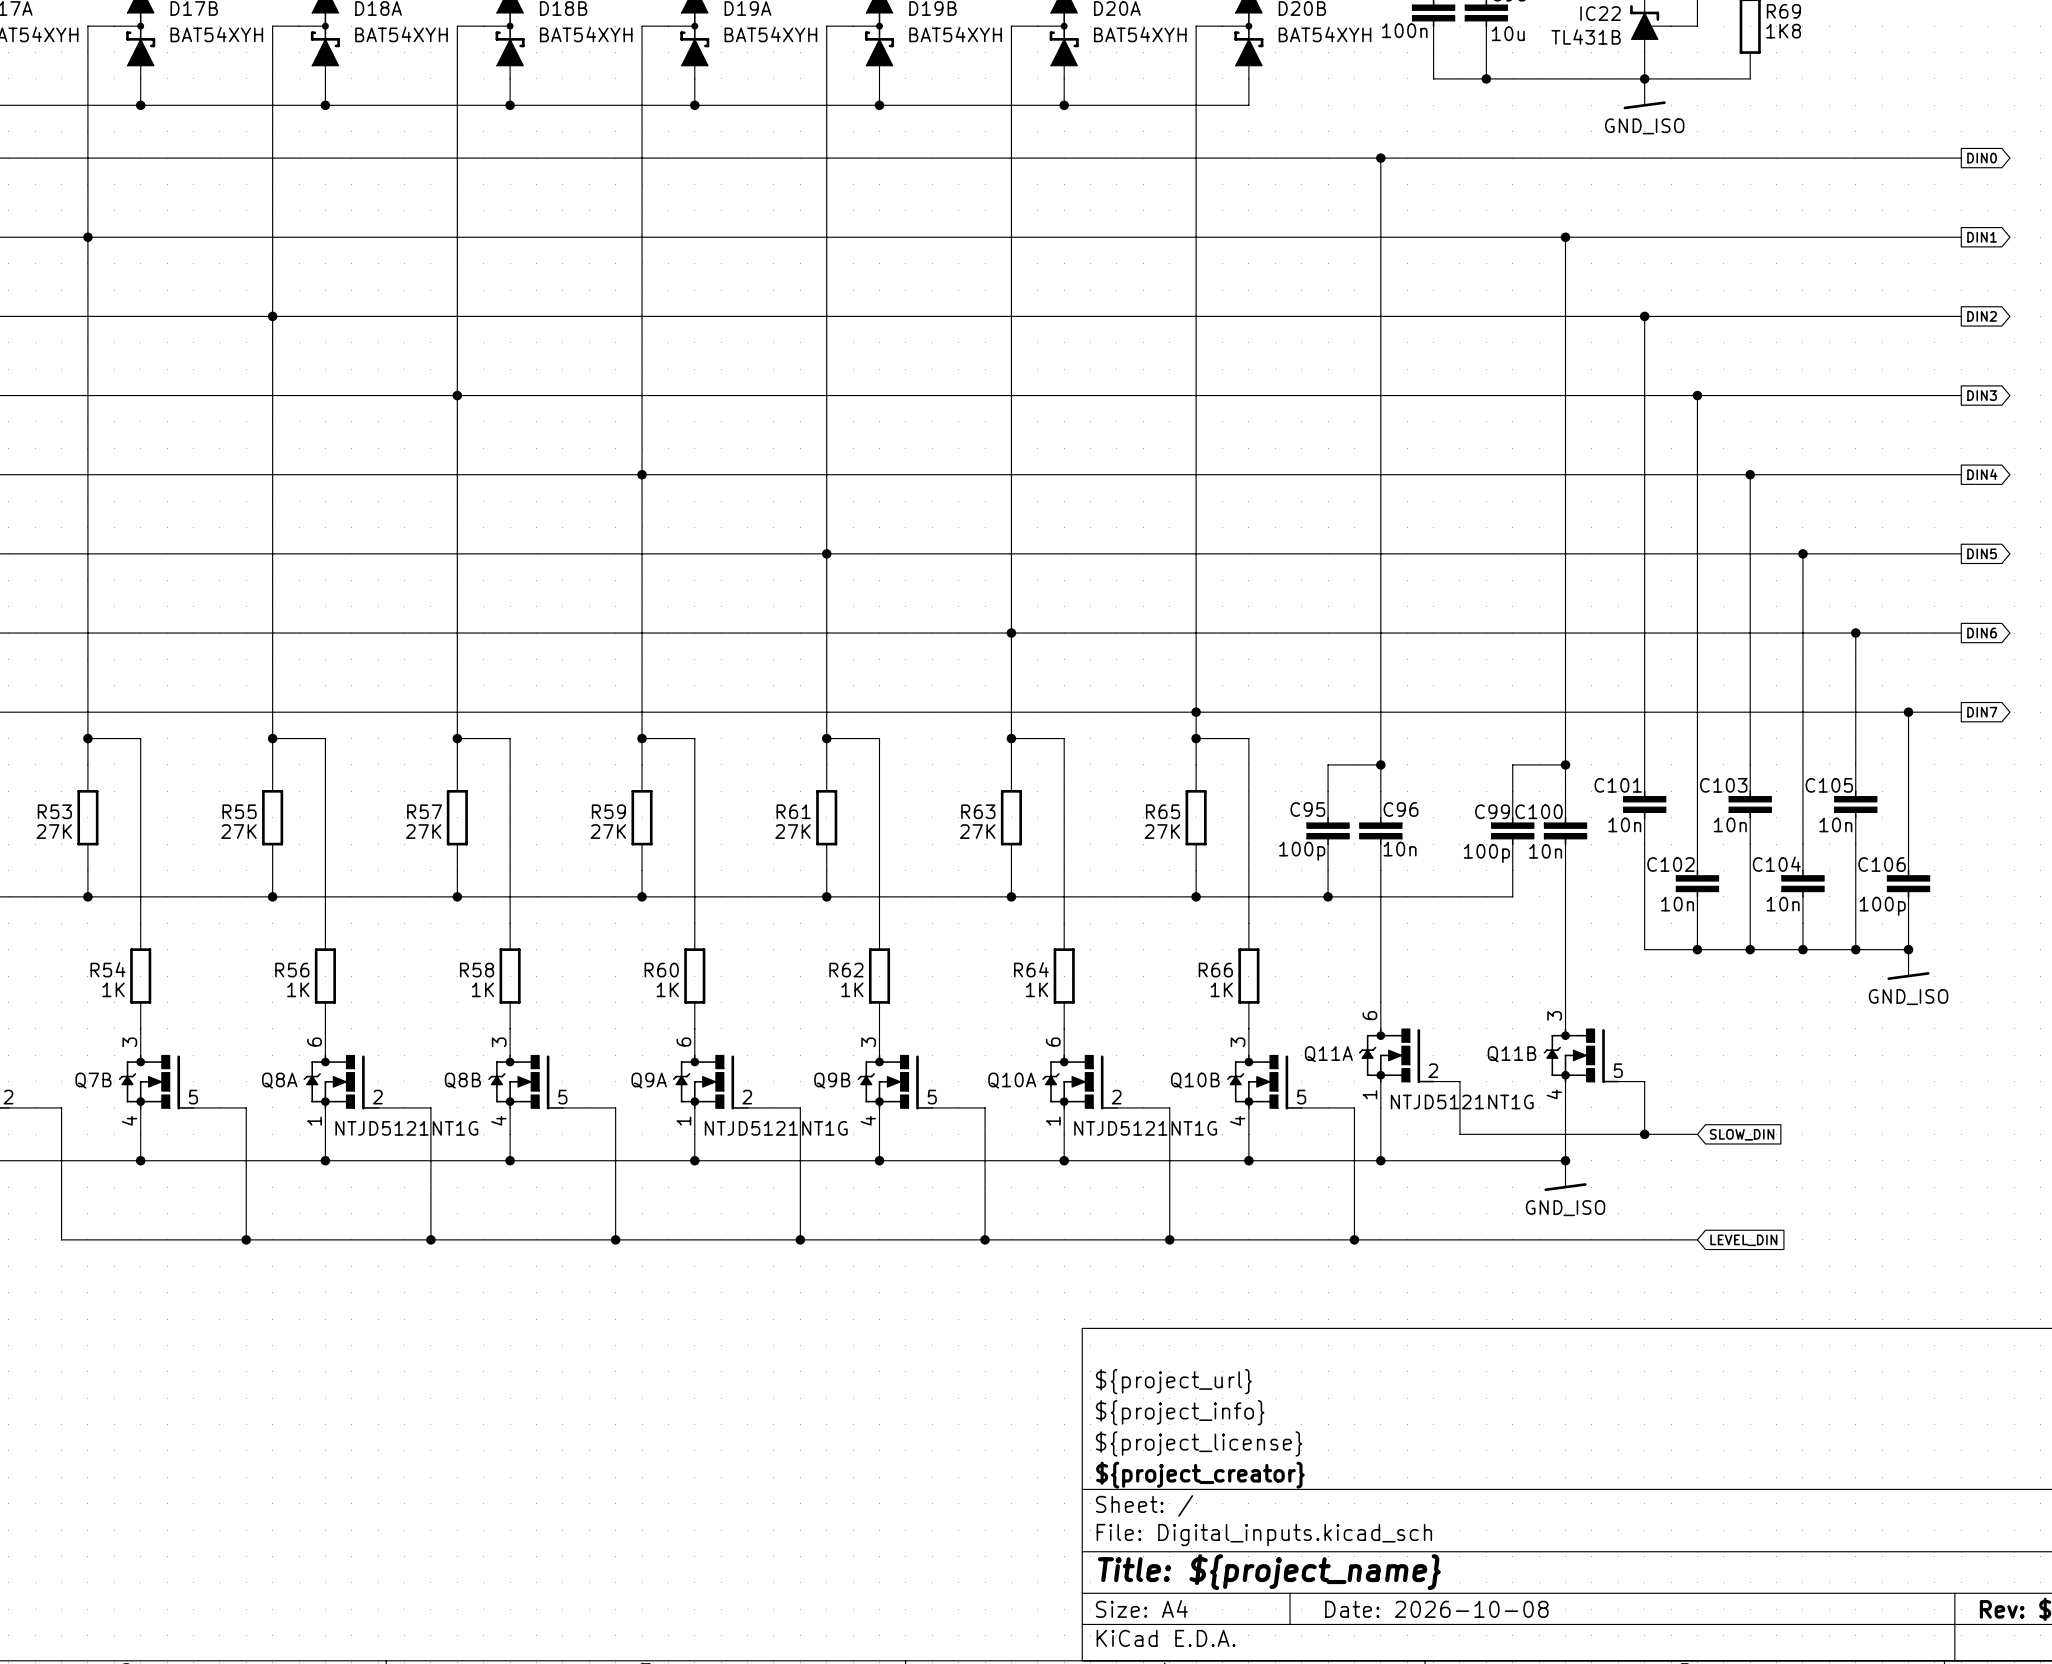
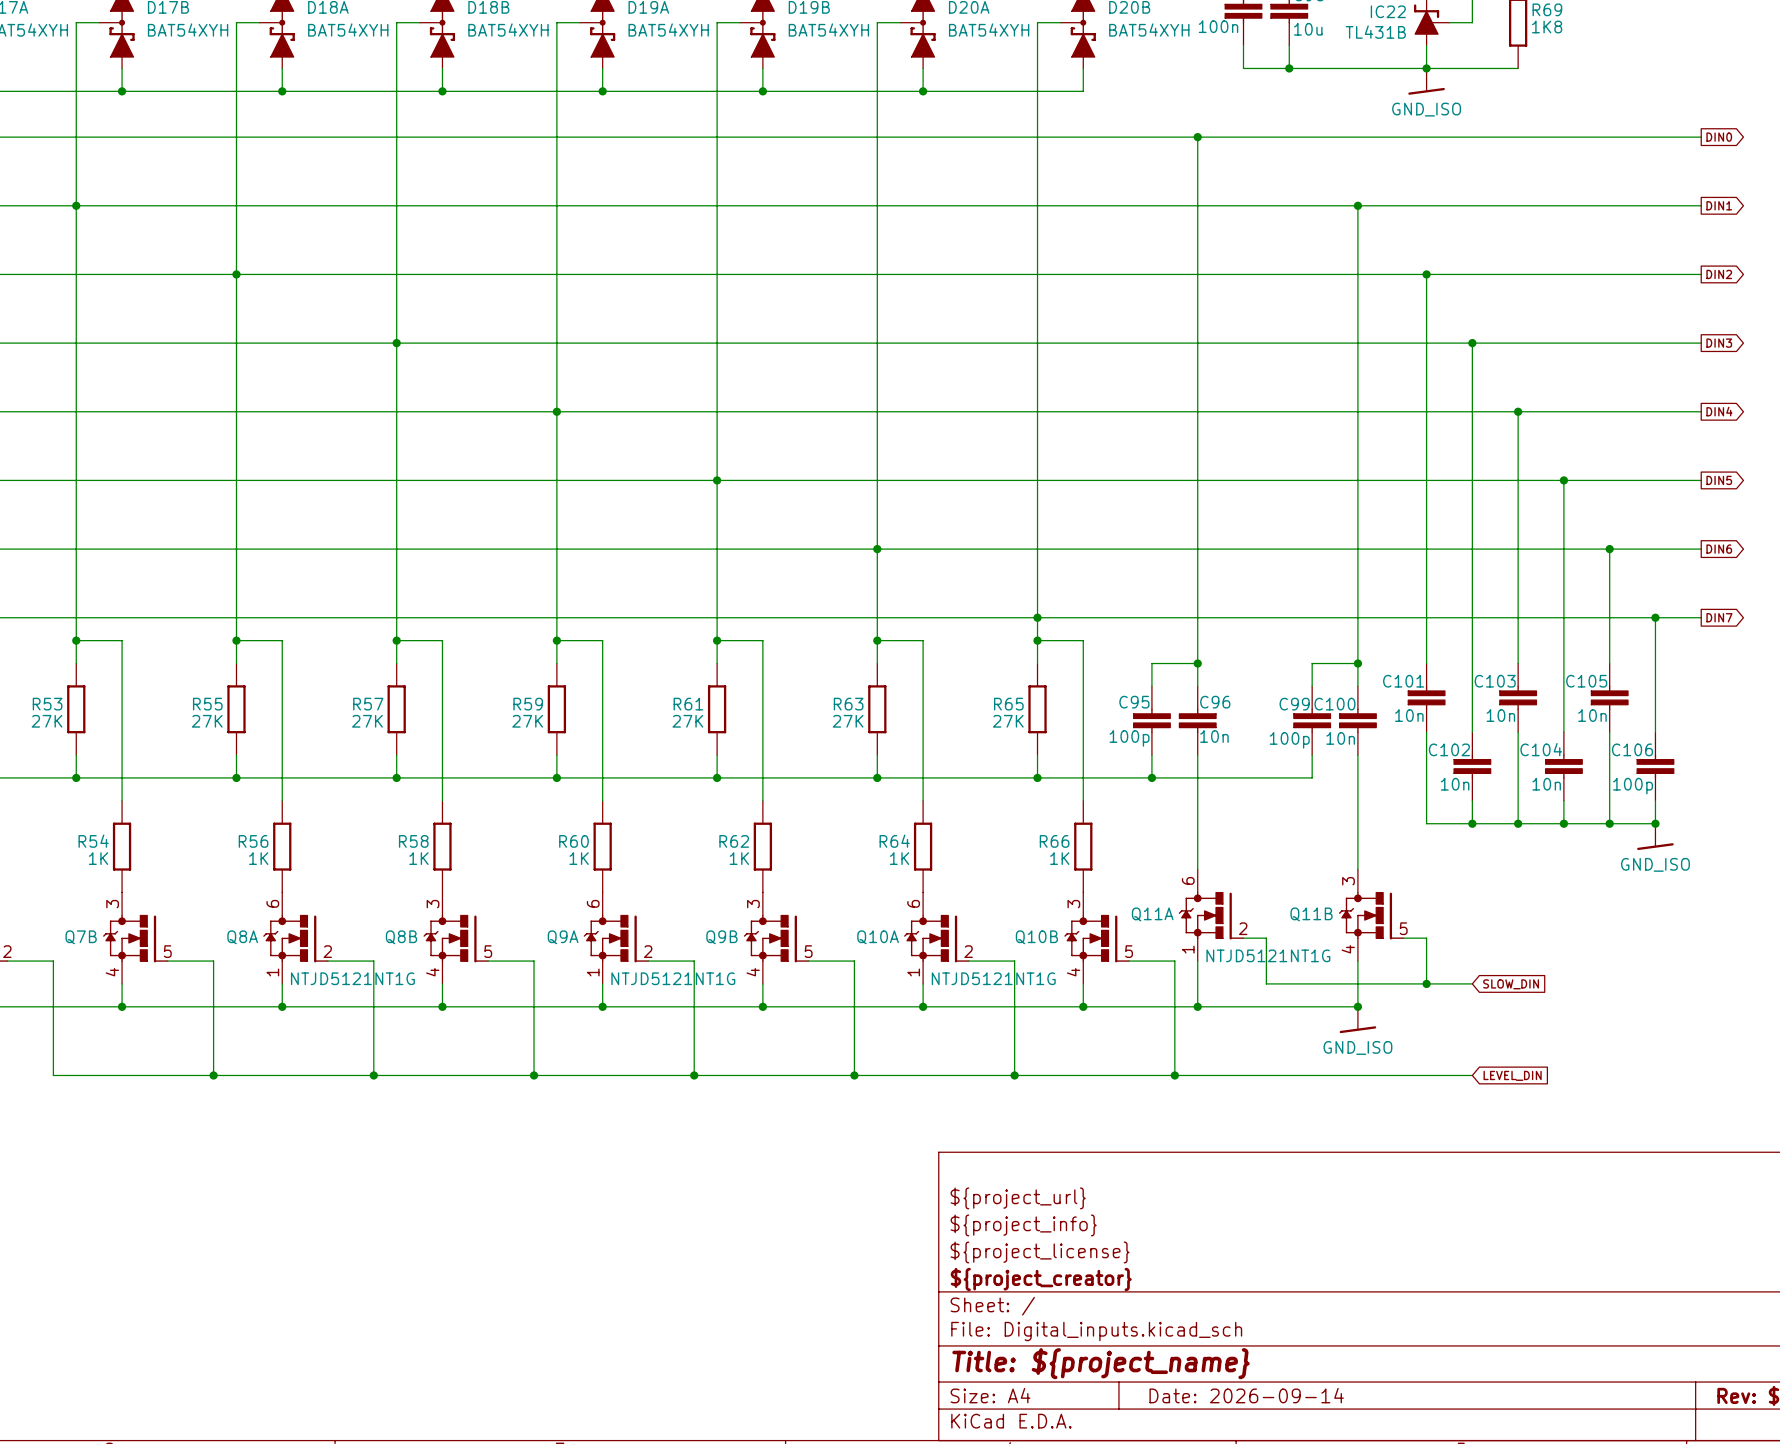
title block: Date: 2026-10-08 (1436, 1609) -> Date: 2026-09-14 (1246, 1395)

